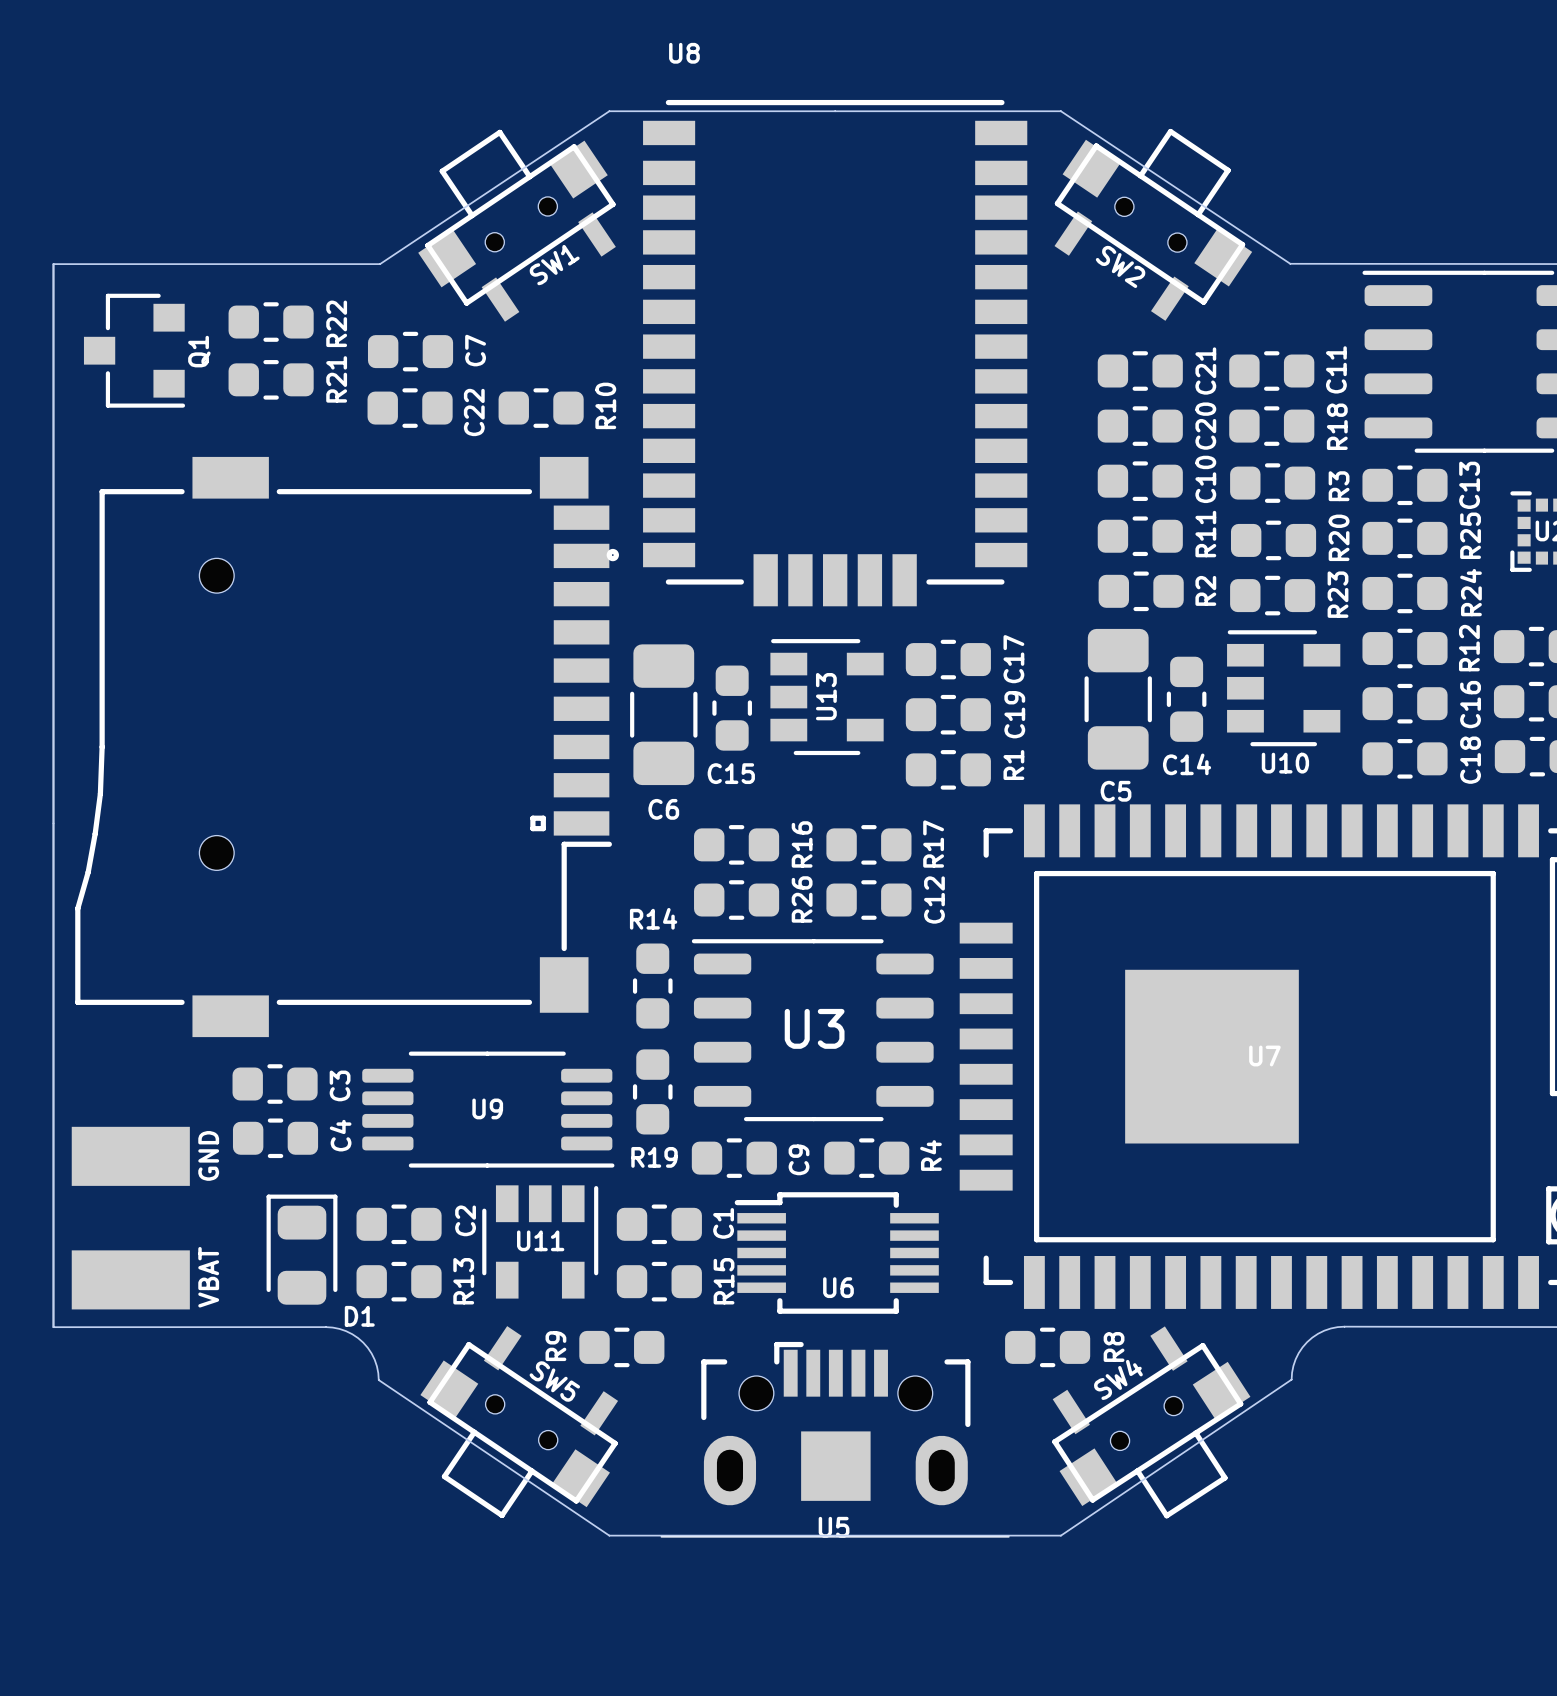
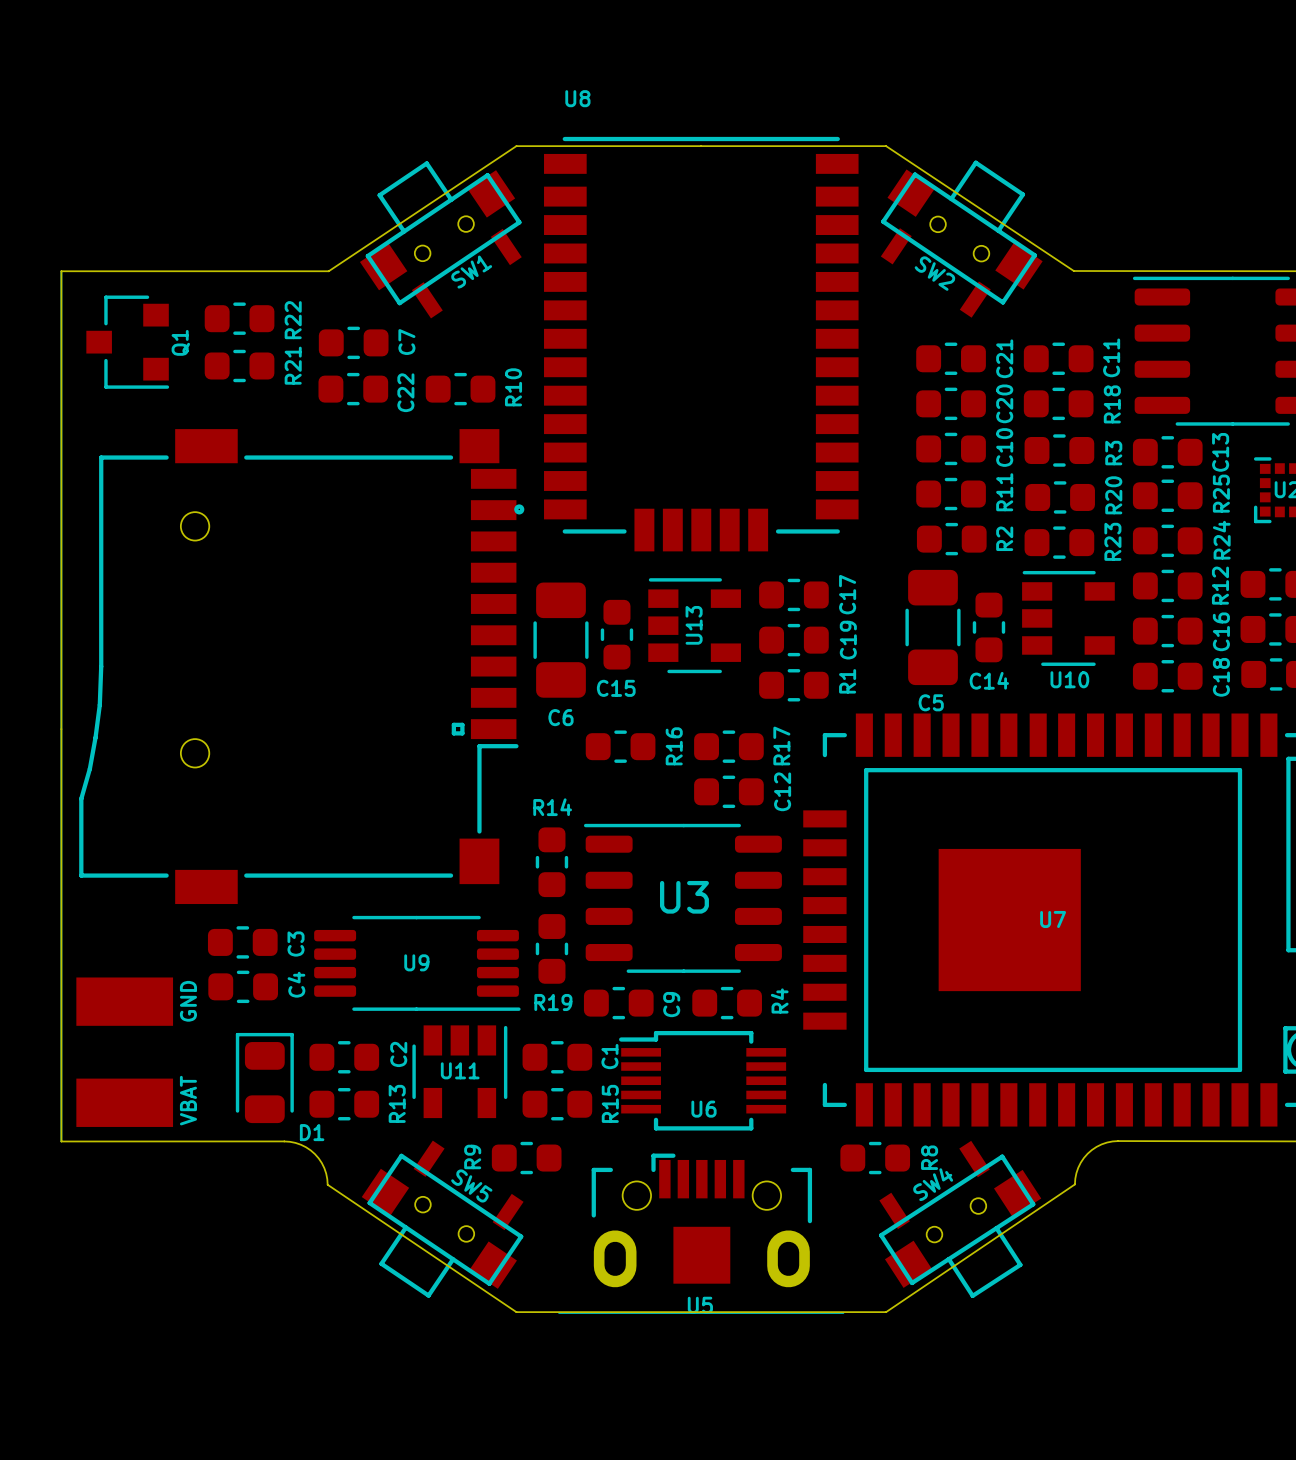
R26: (736, 900) -> none

